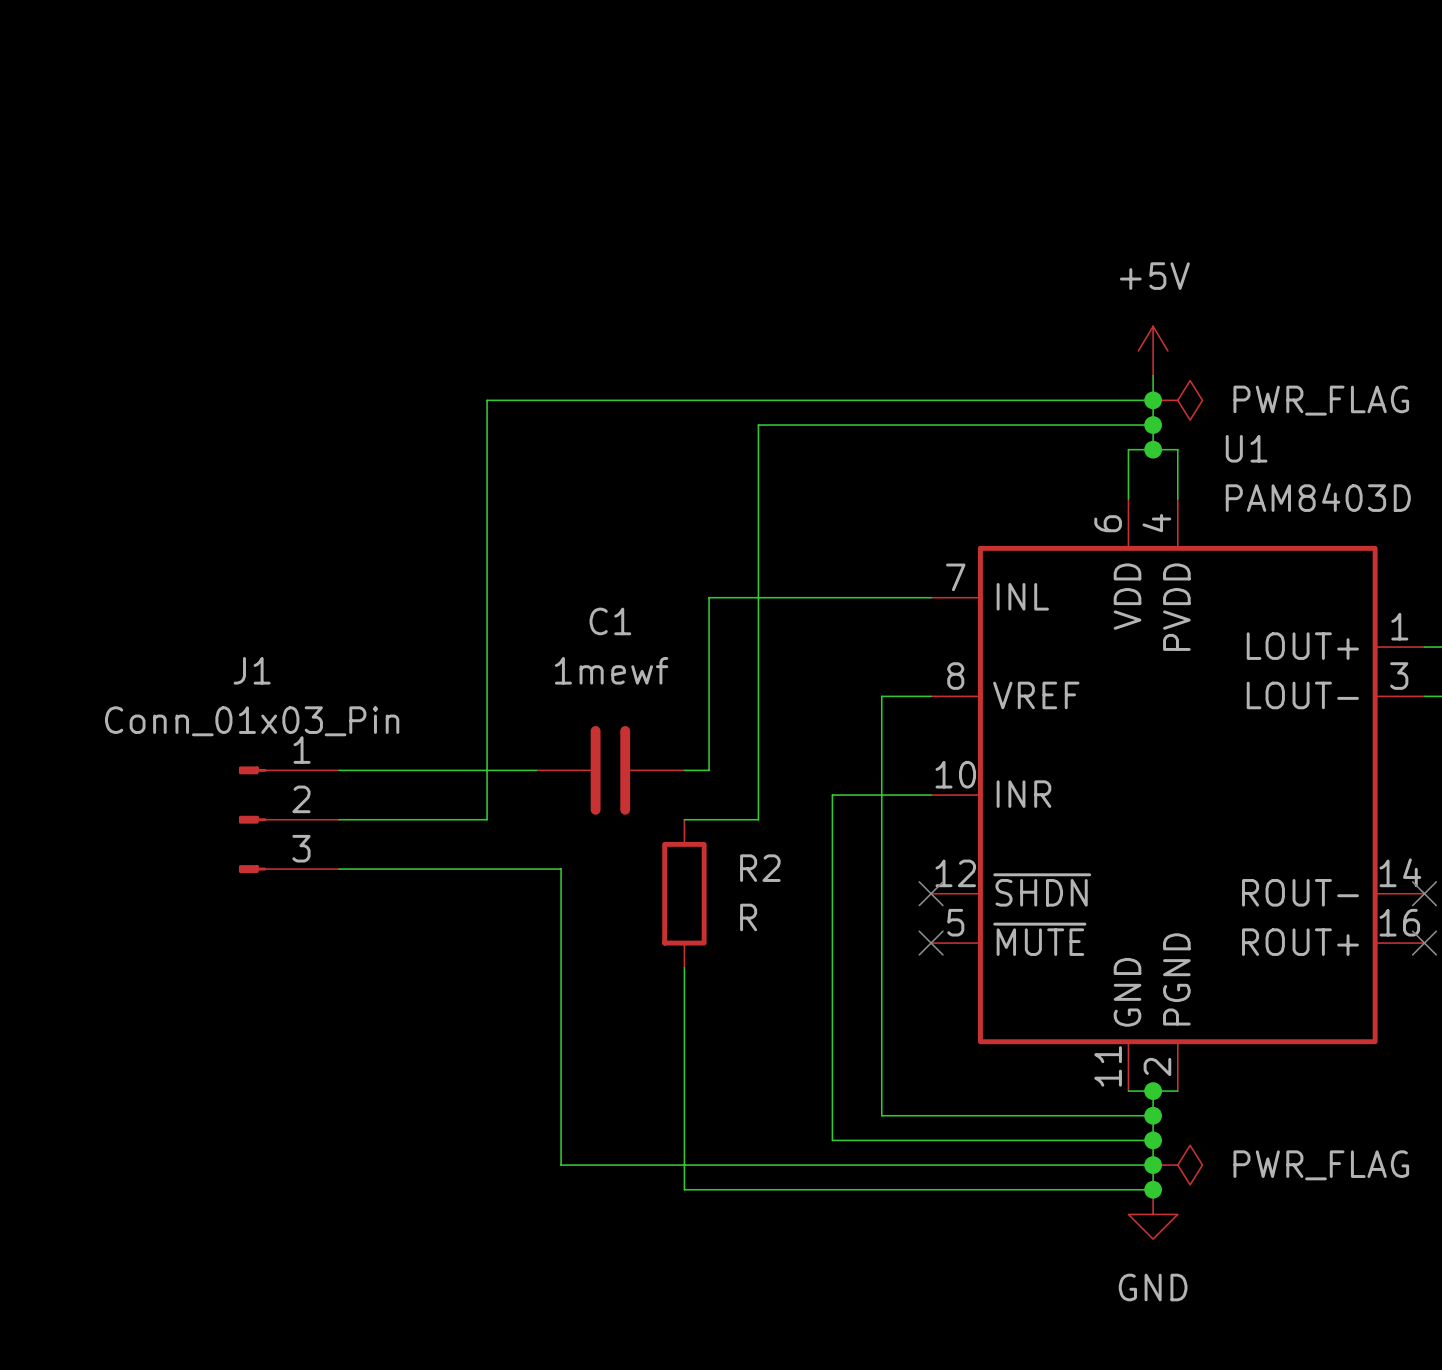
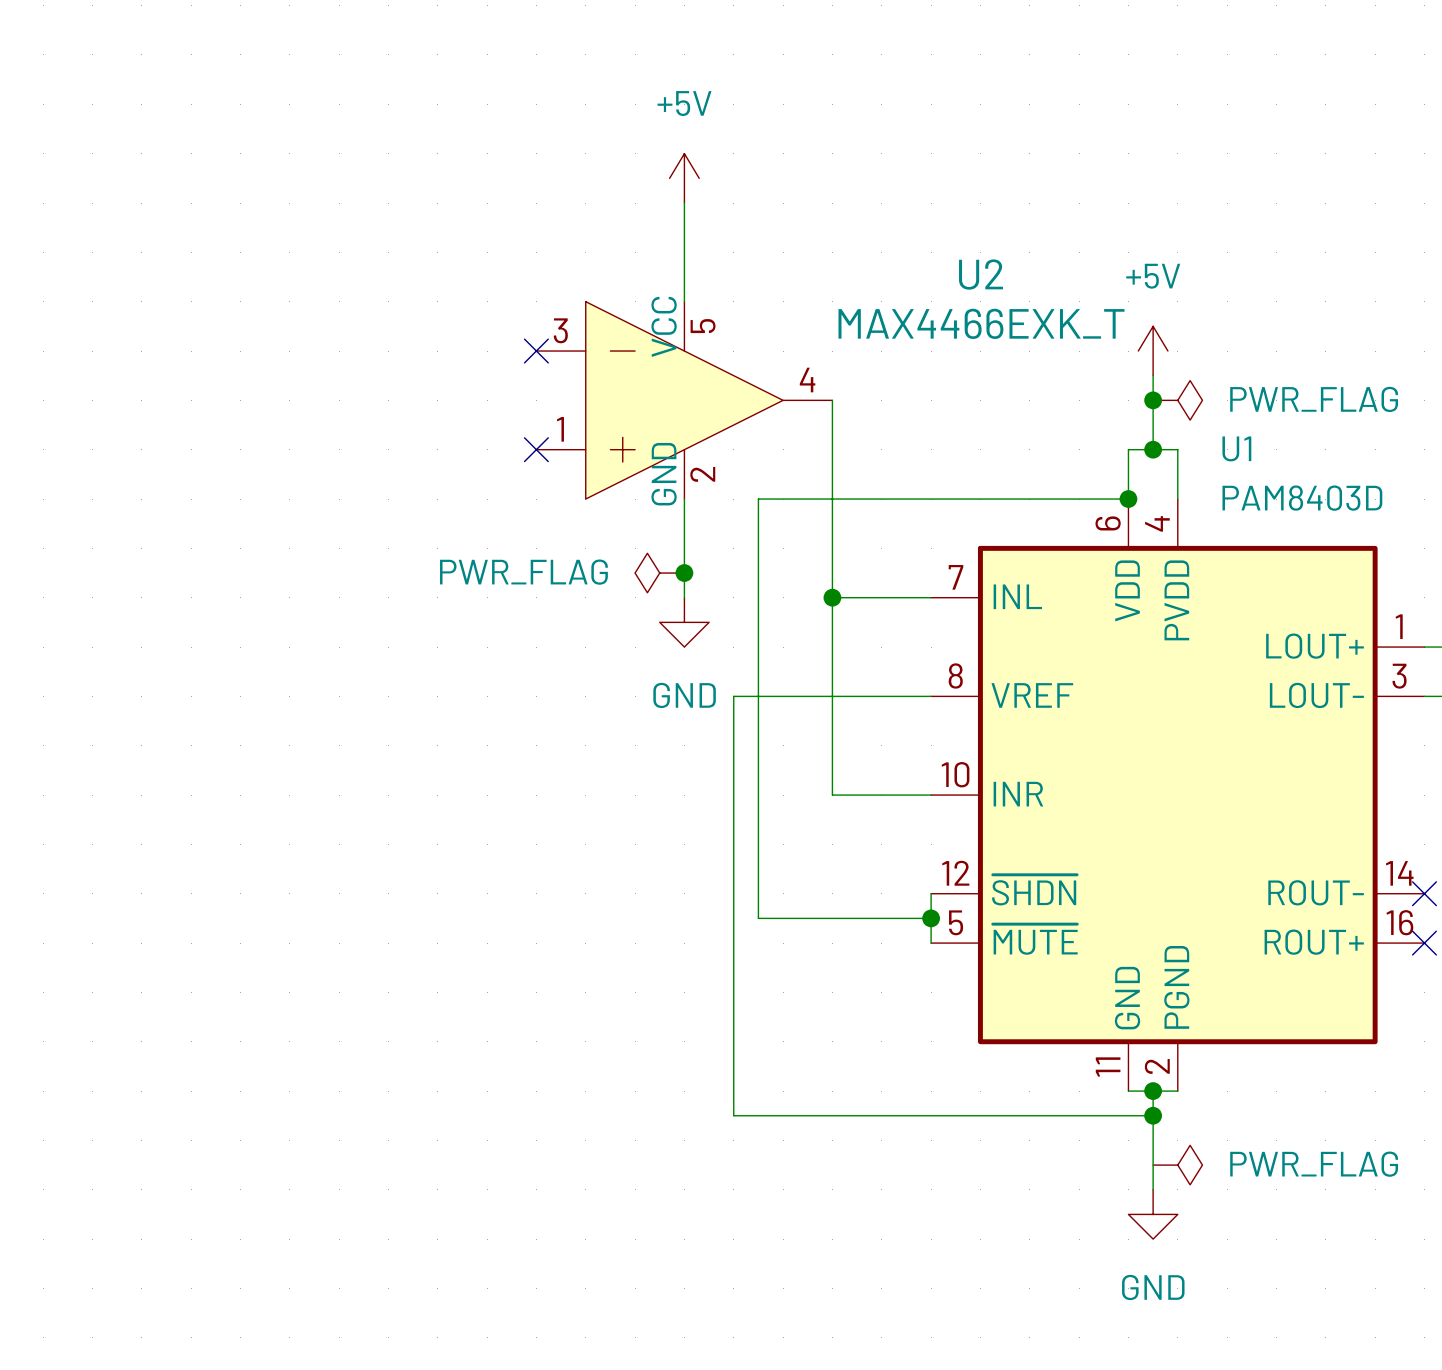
power symbol: none -> +5V (684, 178)
wire: none -> (684, 203) (684, 301)
no-connect mark: none -> (536, 351)
U2: none -> MAX4466EXK_T (684, 400)
wire: (1153, 400) (487, 400) (487, 819) (339, 819) -> none
wire: (1153, 425) (758, 425) (758, 499) -> (1128, 499) (758, 499)
junction position: (1153, 425) -> (1128, 499)
no-connect mark: none -> (536, 449)
wire: none -> (684, 499) (684, 597)
power symbol: none -> PWR_FLAG (659, 573)
junction: none -> (684, 573)
wire: (832, 597) (709, 597) (709, 770) (684, 770) -> none
junction: none -> (832, 597)
power symbol: none -> GND (684, 622)
wire: (881, 696) (881, 1115) -> (881, 696) (733, 696) (733, 1115) (881, 1115)
wire: (339, 770) (536, 770) -> none
C1: 1mewf (610, 770) -> none
wire: (832, 795) (832, 1140) (1153, 1140) -> (832, 795) (832, 400)
J1: Conn_01x03_Pin (288, 819) -> none
wire: (684, 819) (758, 819) -> (931, 918) (758, 918) (758, 819)
wire: (339, 869) (561, 869) (561, 1165) (1153, 1165) -> none
R2: R (684, 893) -> none
wire: none -> (931, 893) (931, 943)
no-connect mark: (931, 893) -> none
junction: none -> (931, 918)
no-connect mark: (931, 943) -> none
wire: (684, 967) (684, 1189) (1153, 1189) -> none
junction: (1153, 1140) -> none
junction: (1153, 1165) -> none
junction: (1153, 1189) -> none

